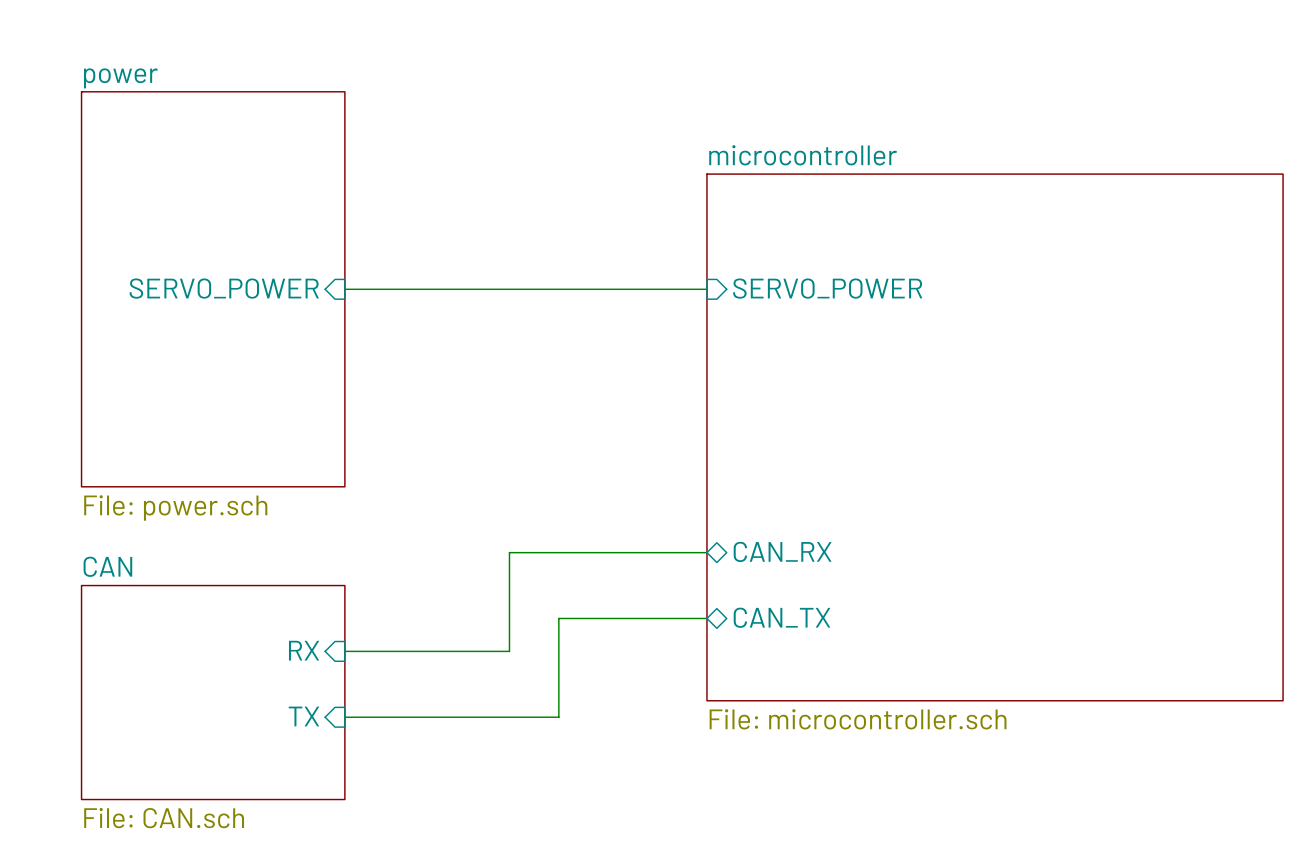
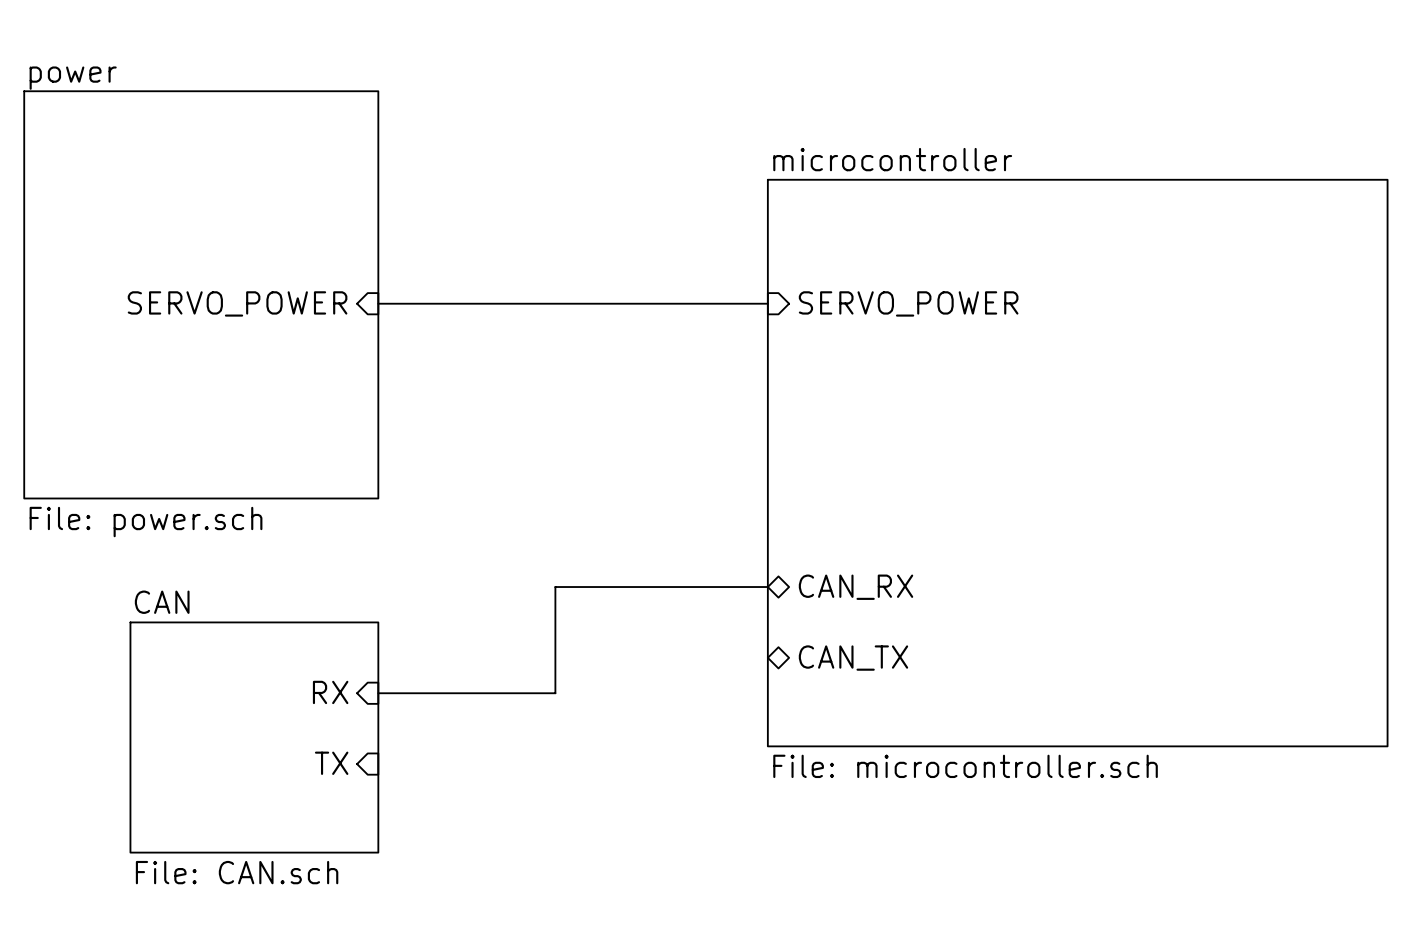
sheet power: none -> File: power.sch (201, 294)
sheet power: File: power.sch (213, 289) -> none
wire: (706, 618) (558, 618) (558, 717) (344, 717) -> none
sheet CAN: File: CAN.sch (213, 692) -> none
sheet CAN: none -> File: CAN.sch (254, 737)

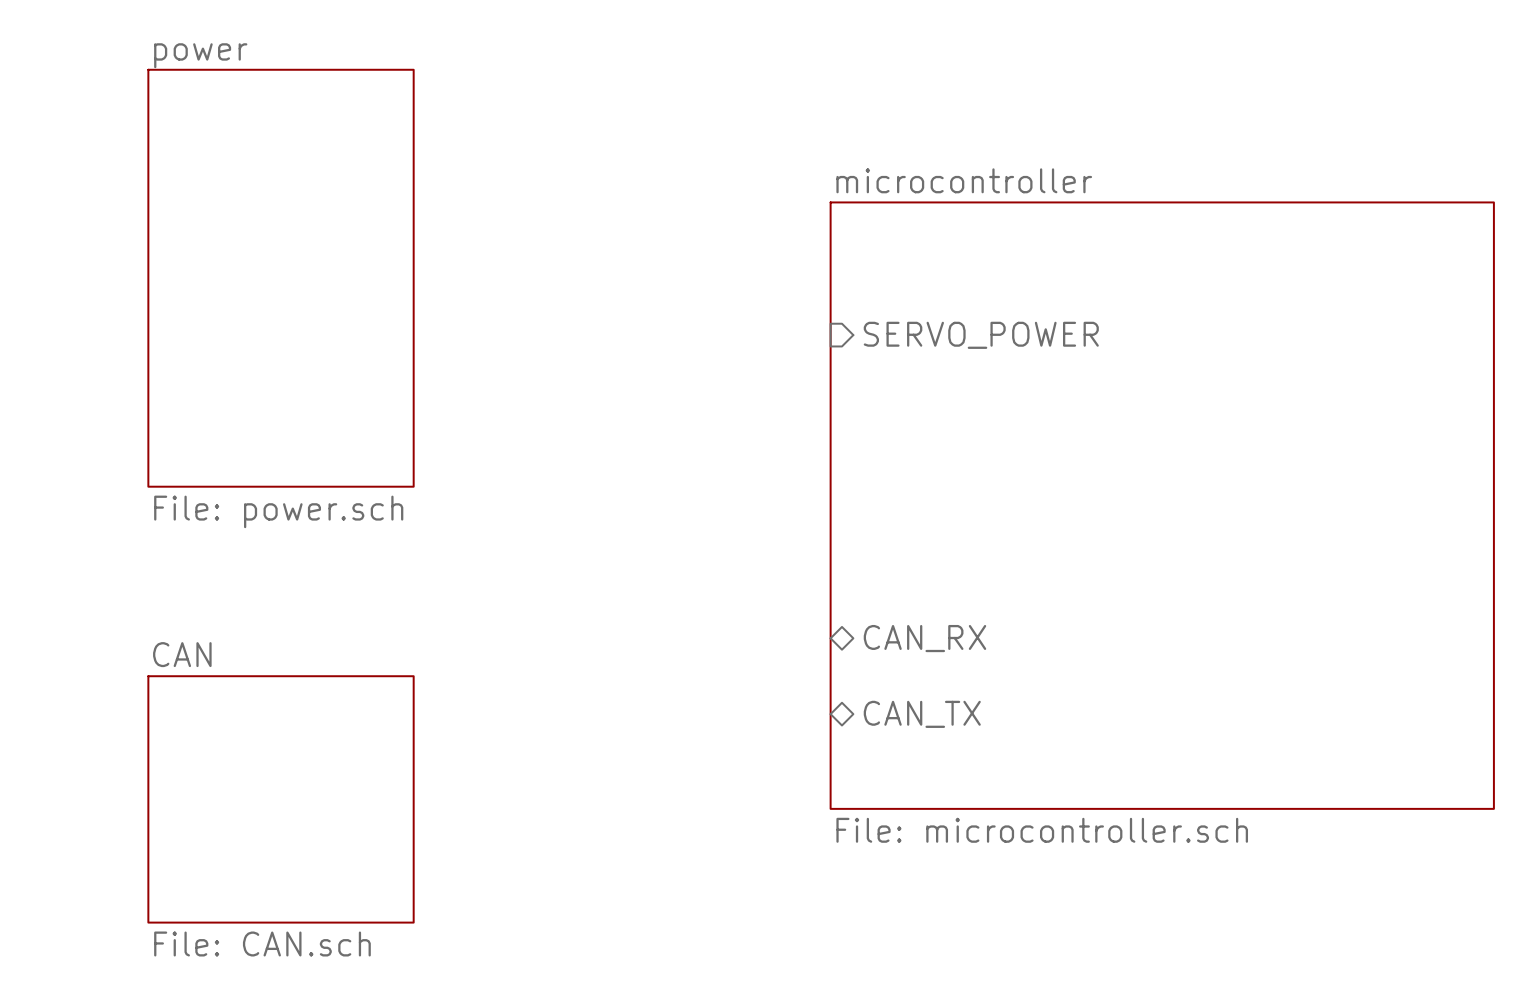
sheet power: none -> File: power.sch (281, 278)
sheet power: File: power.sch (201, 294) -> none
sheet pin: SERVO_POWER (237, 303) -> none
wire: (378, 303) (767, 303) -> none
wire: (767, 587) (555, 587) (555, 693) (378, 693) -> none
sheet pin: RX (330, 692) -> none
sheet pin: TX (331, 763) -> none

